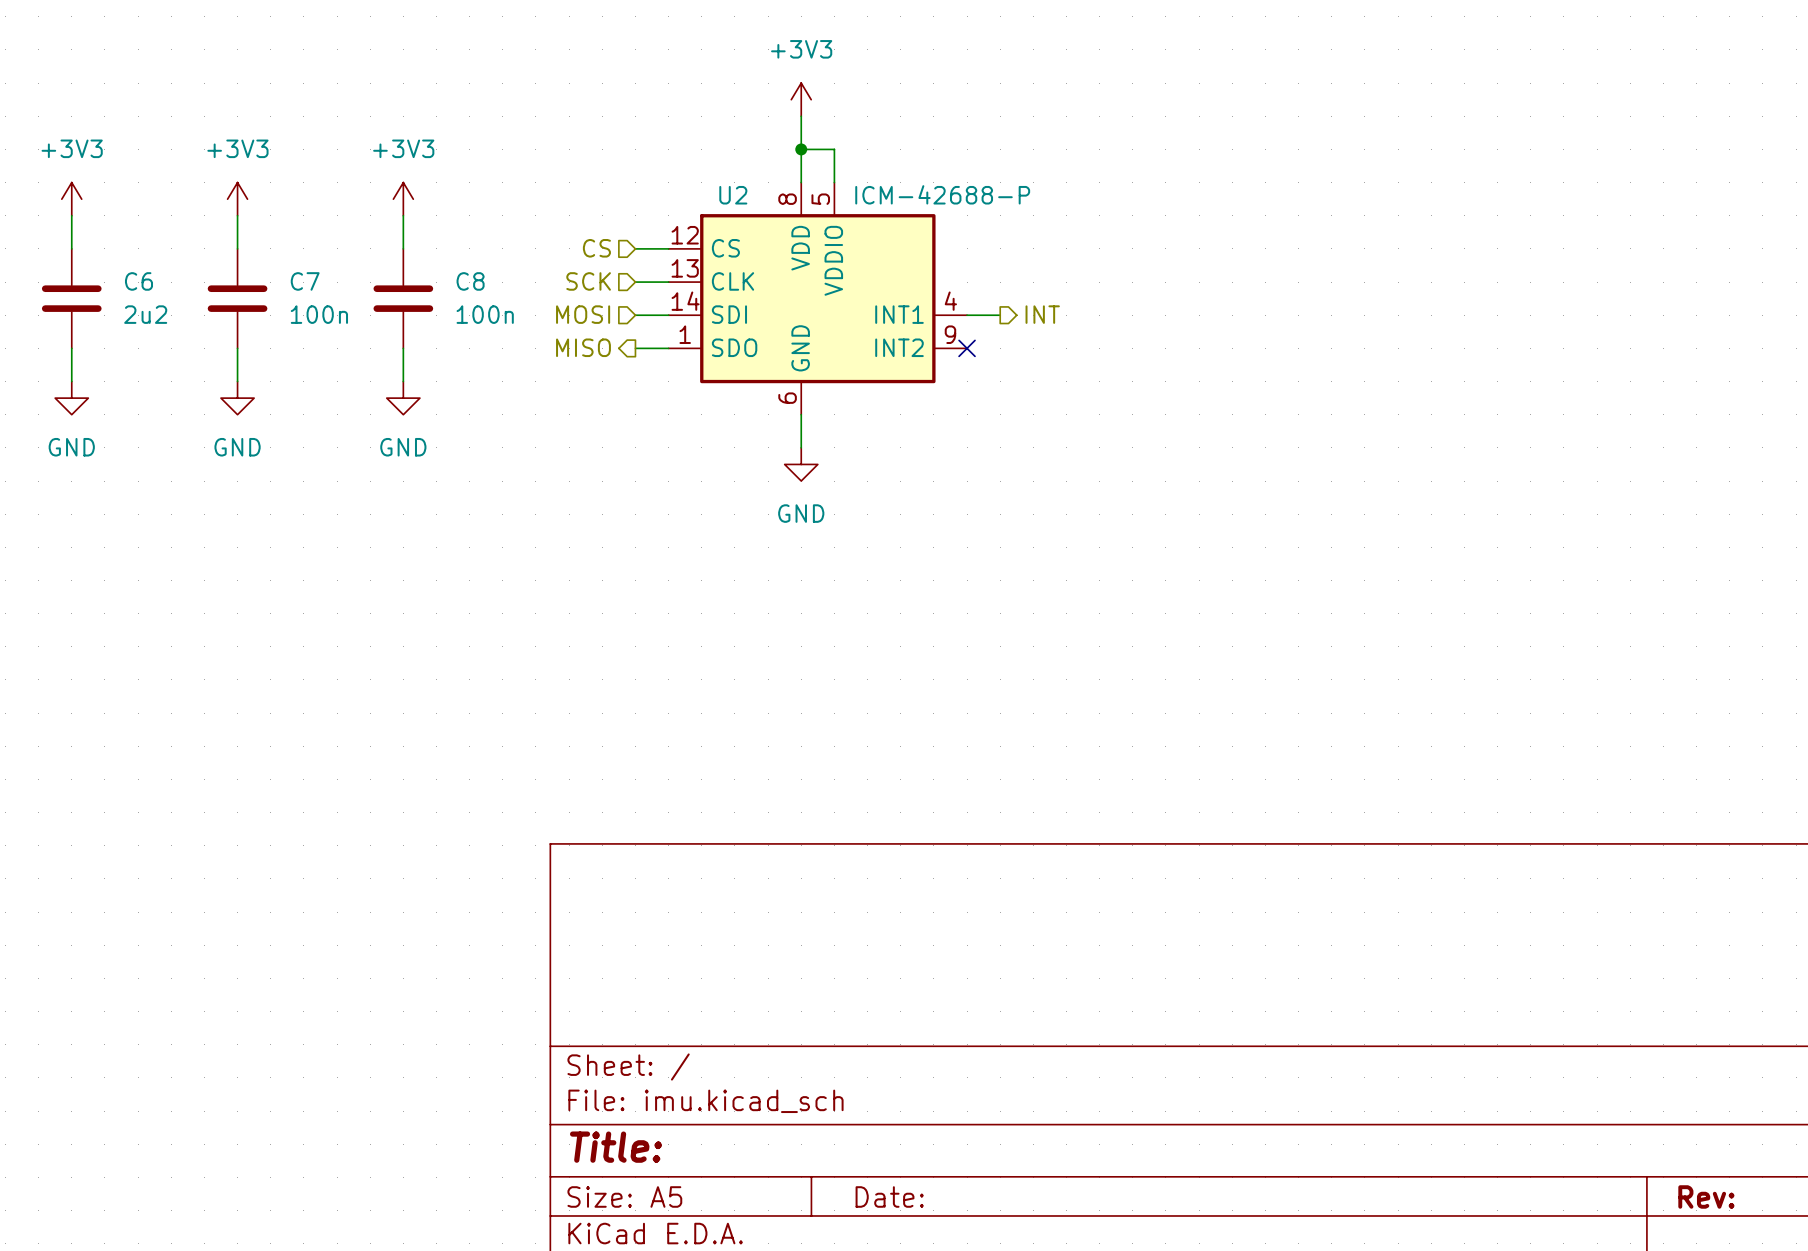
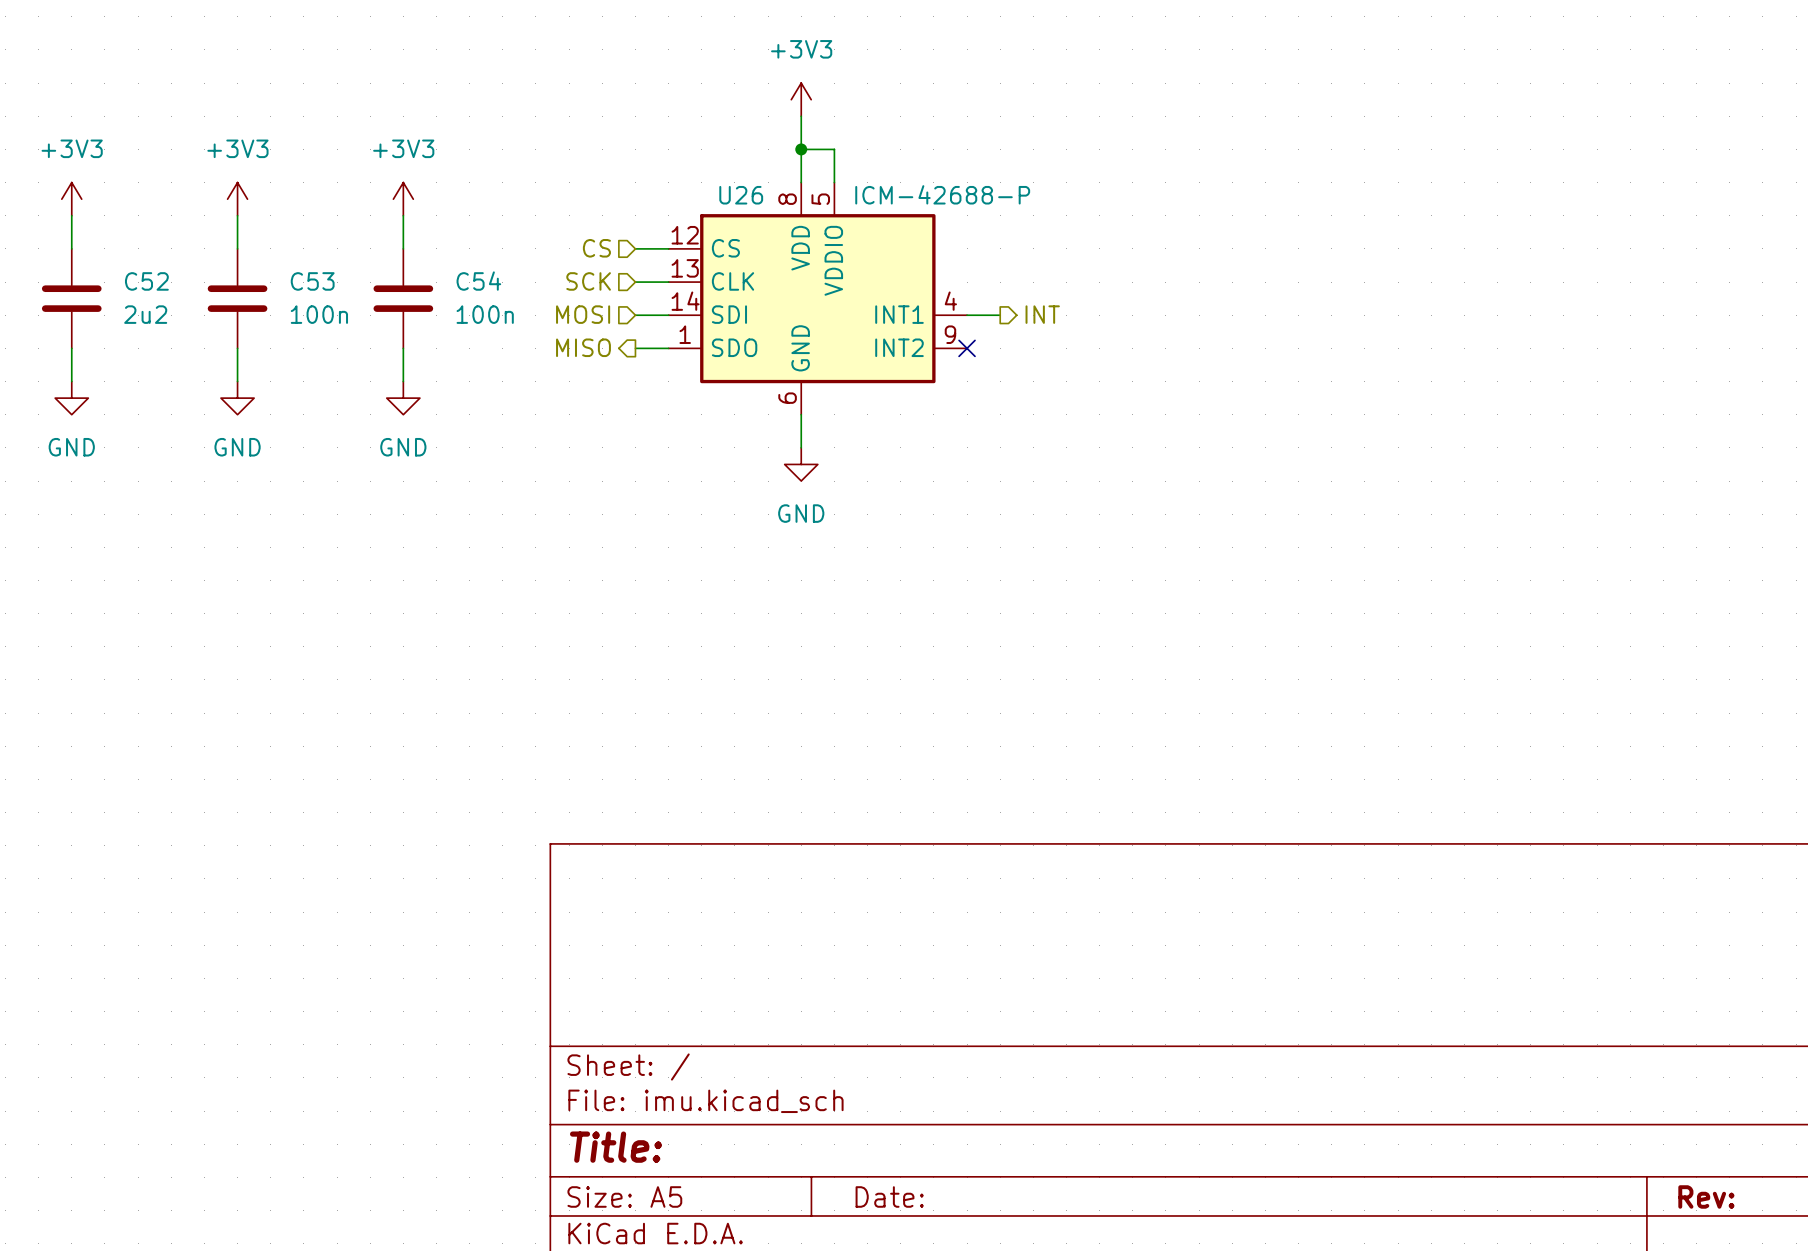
U2 name: U2 (733, 195) -> U26 (741, 195)
C6 name: C6 (138, 281) -> C52 (146, 281)
C7 name: C7 (305, 281) -> C53 (312, 281)
C8 name: C8 (470, 281) -> C54 (478, 281)

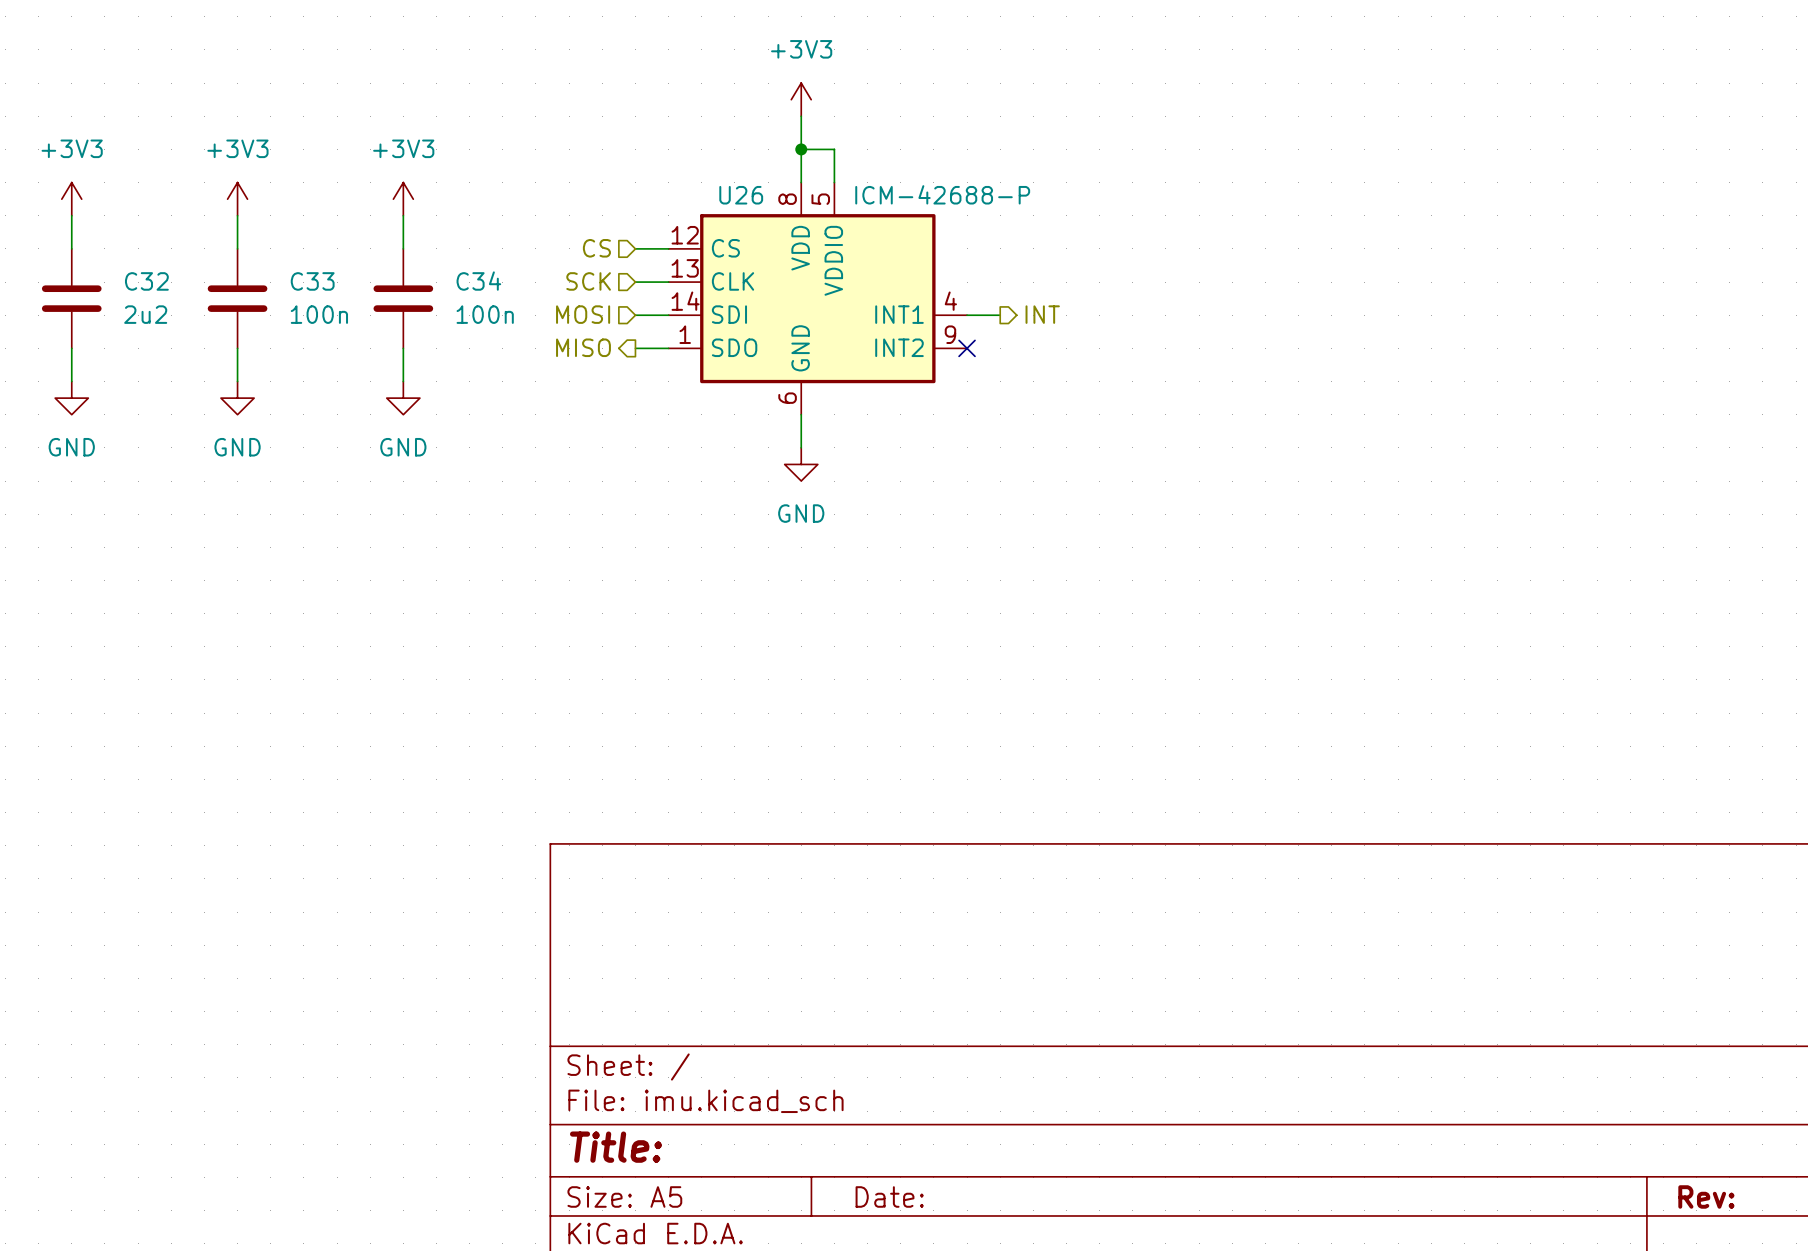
C52 name: C52 (146, 281) -> C32 (146, 281)
C53 name: C53 (312, 281) -> C33 (312, 281)
C54 name: C54 (478, 281) -> C34 (478, 281)

